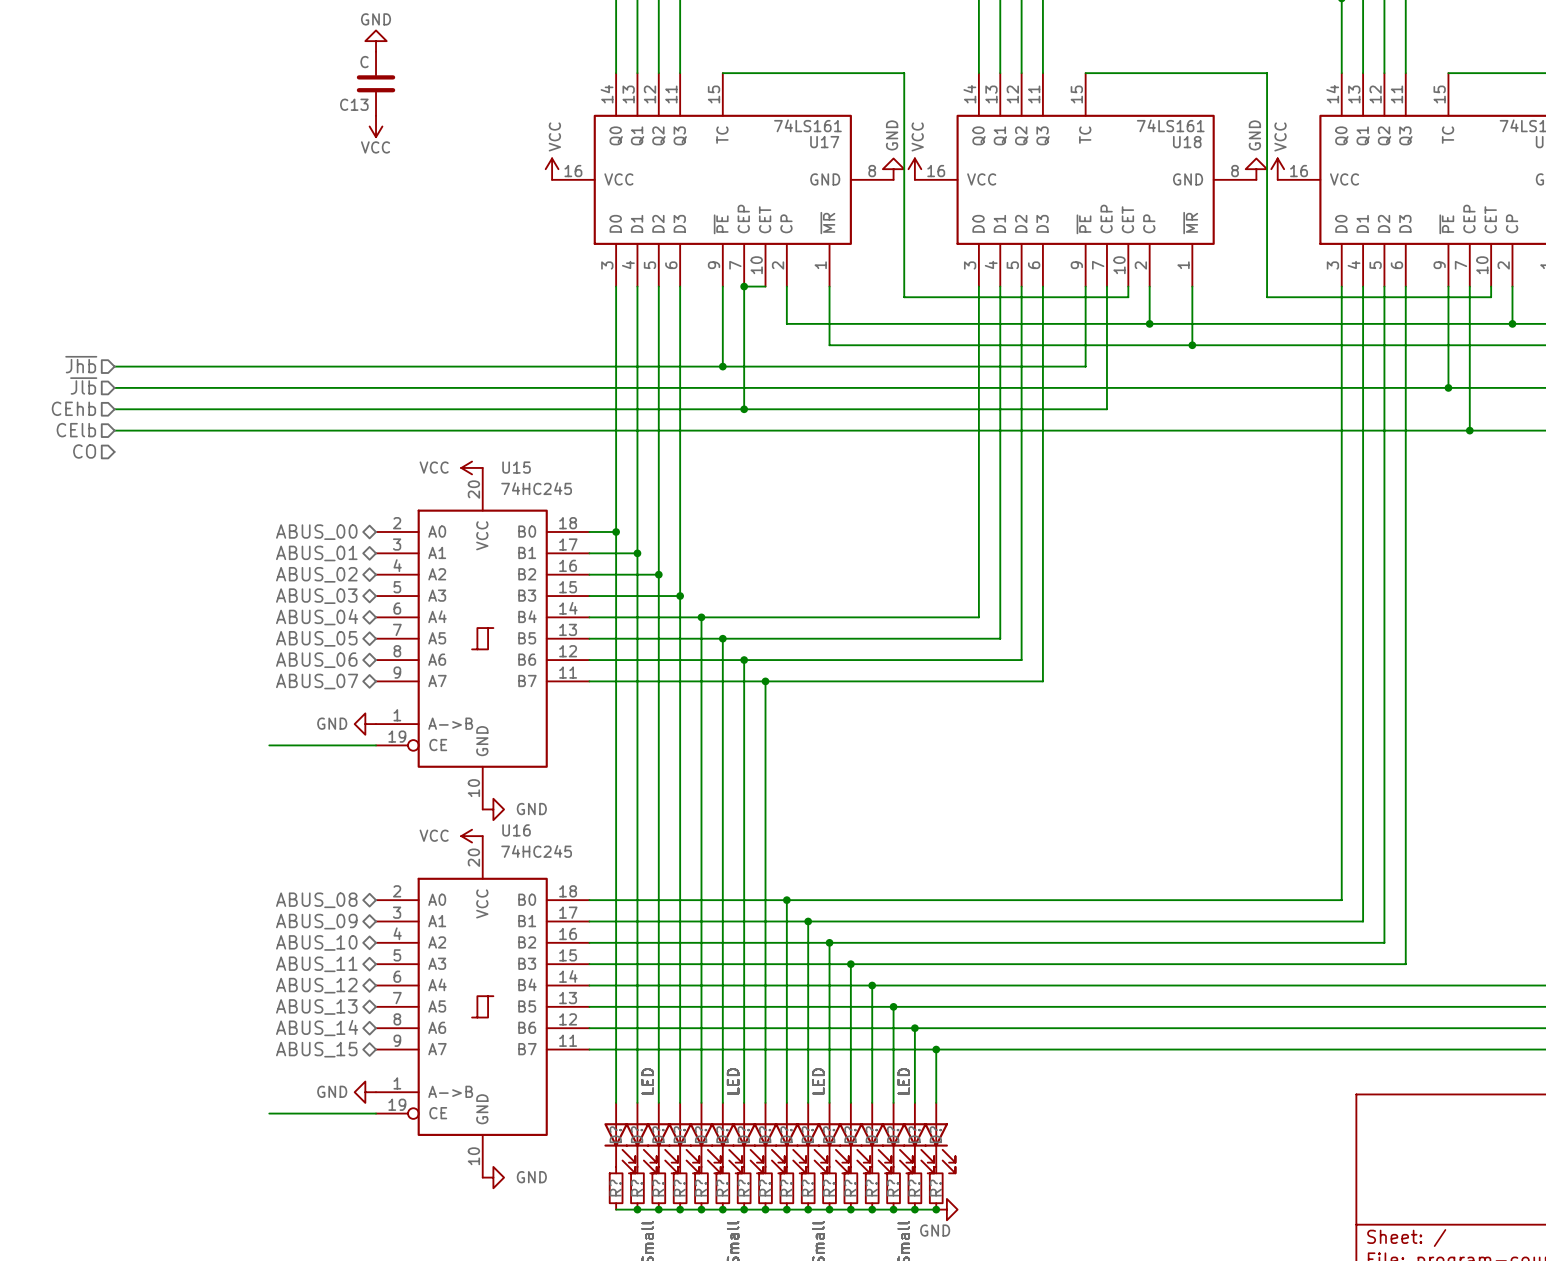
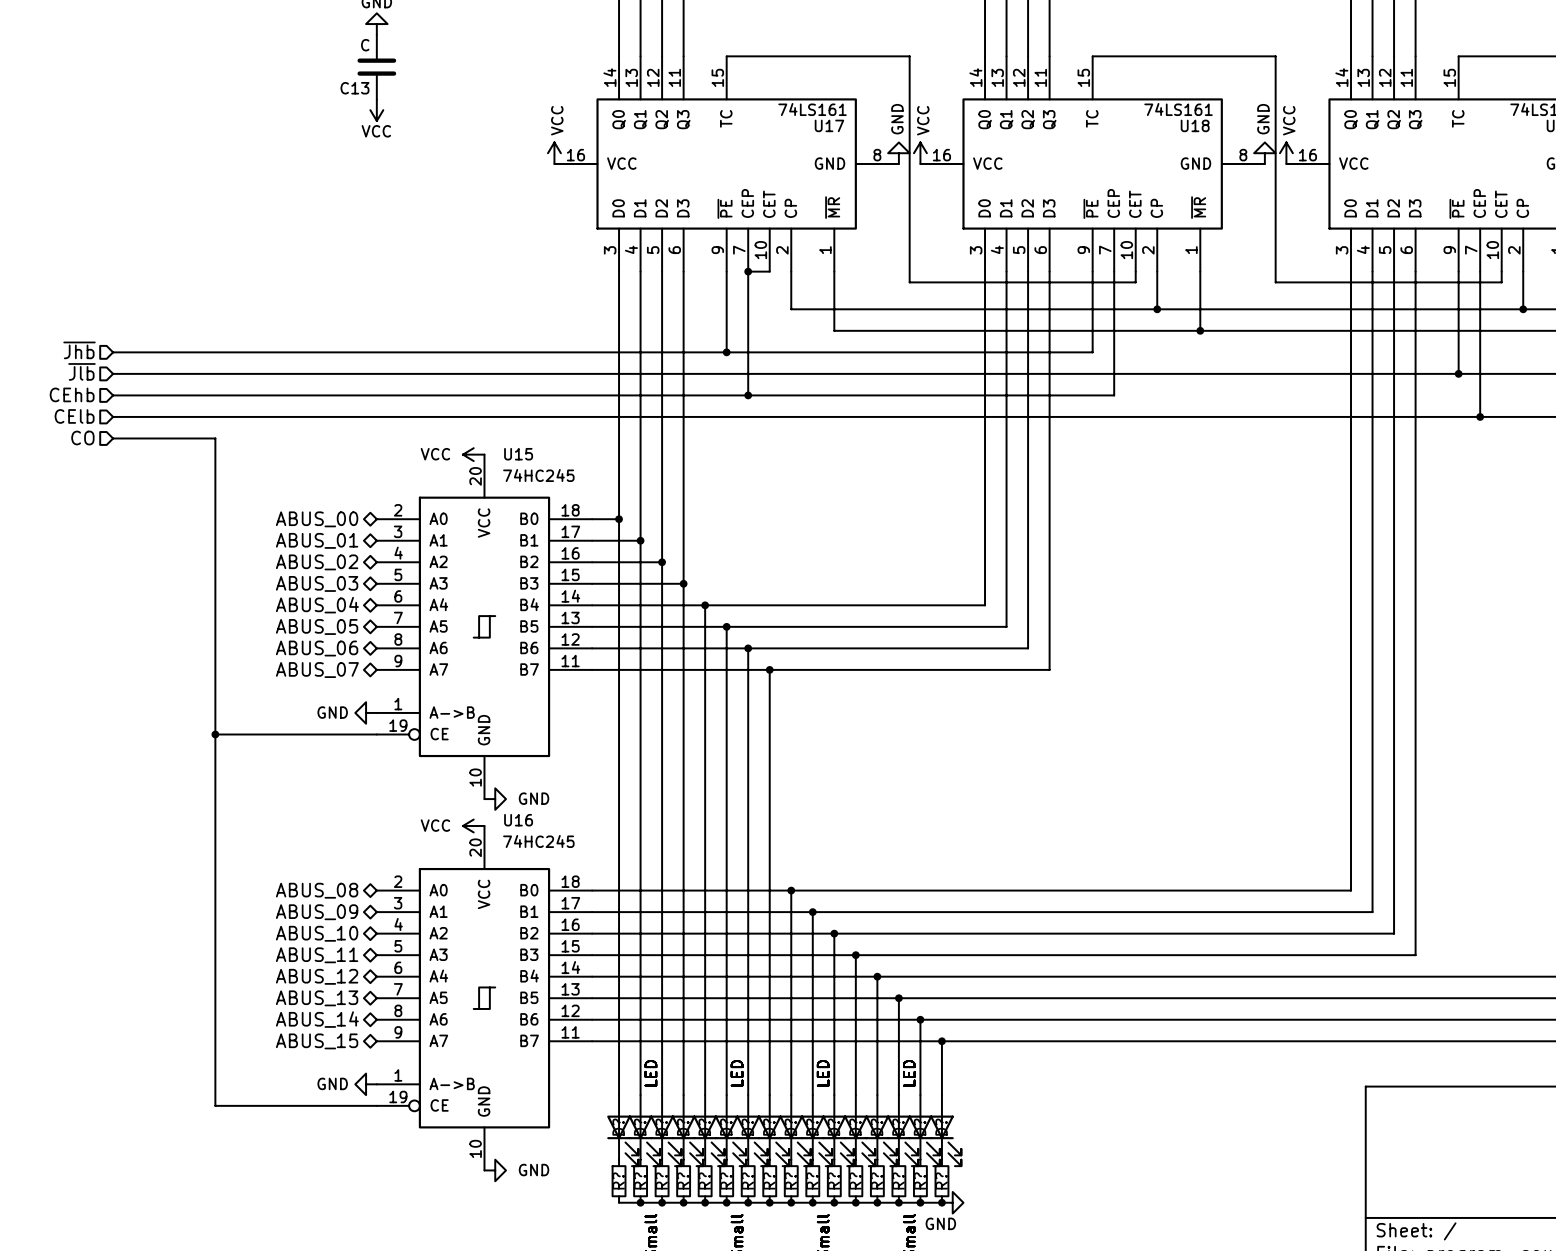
wire: none -> (113, 438) (215, 438) (215, 1105) (269, 1105)
wire: none -> (215, 734) (269, 734)
junction: none -> (215, 734)

